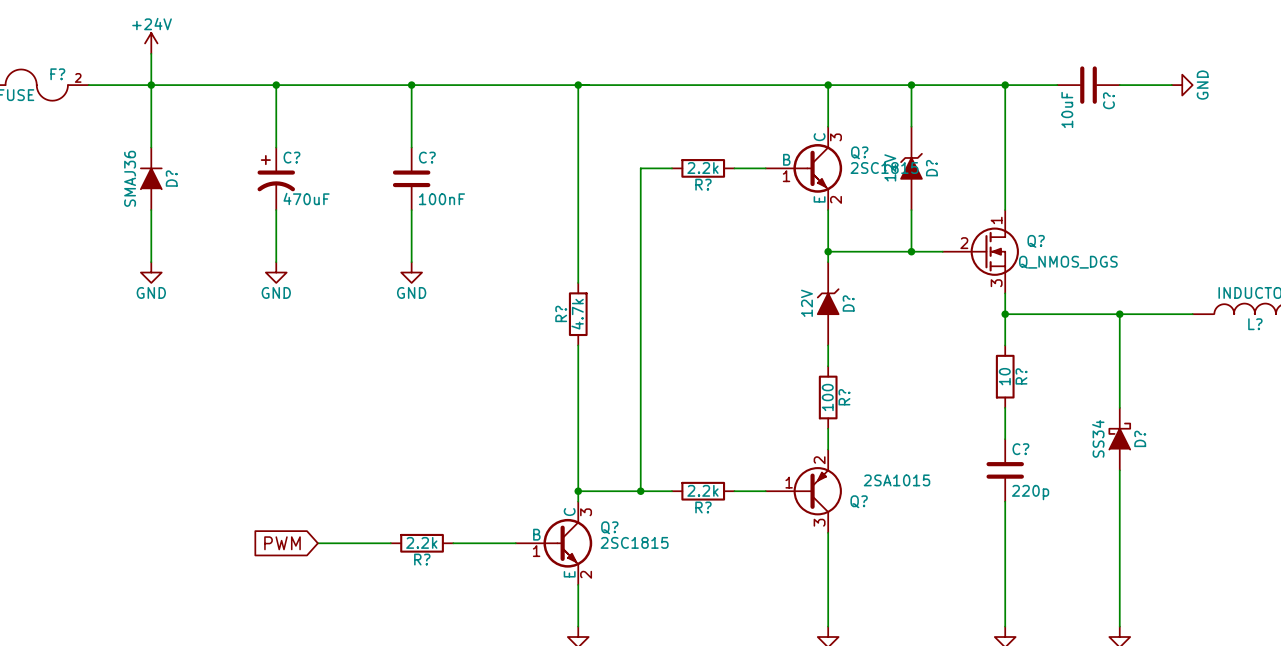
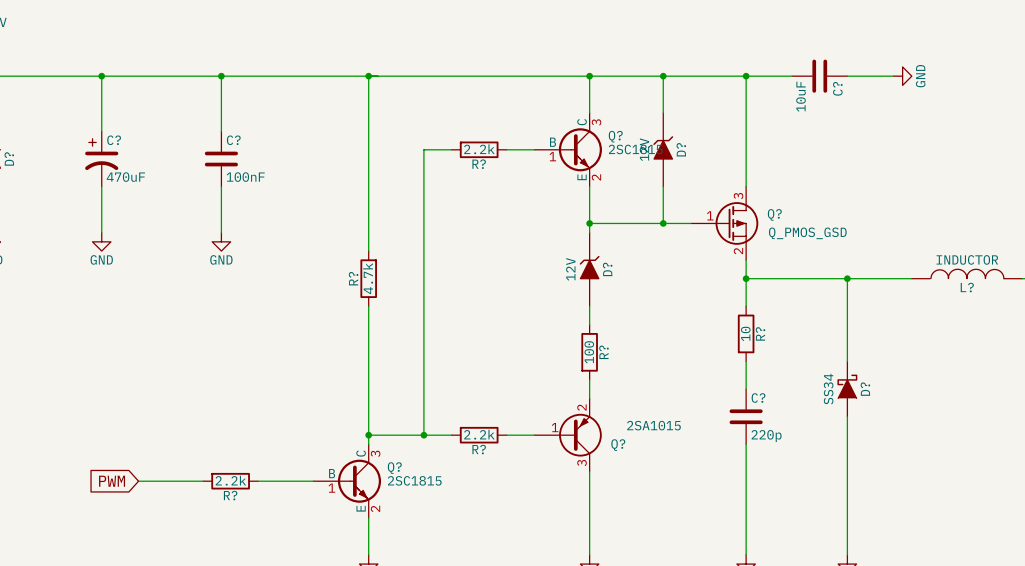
Q? symbol: [942, 210, 1019, 294] -> [690, 186, 759, 261]
Q? value: Q_NMOS_DGS (1068, 262) -> Q_PMOS_GSD (807, 233)

